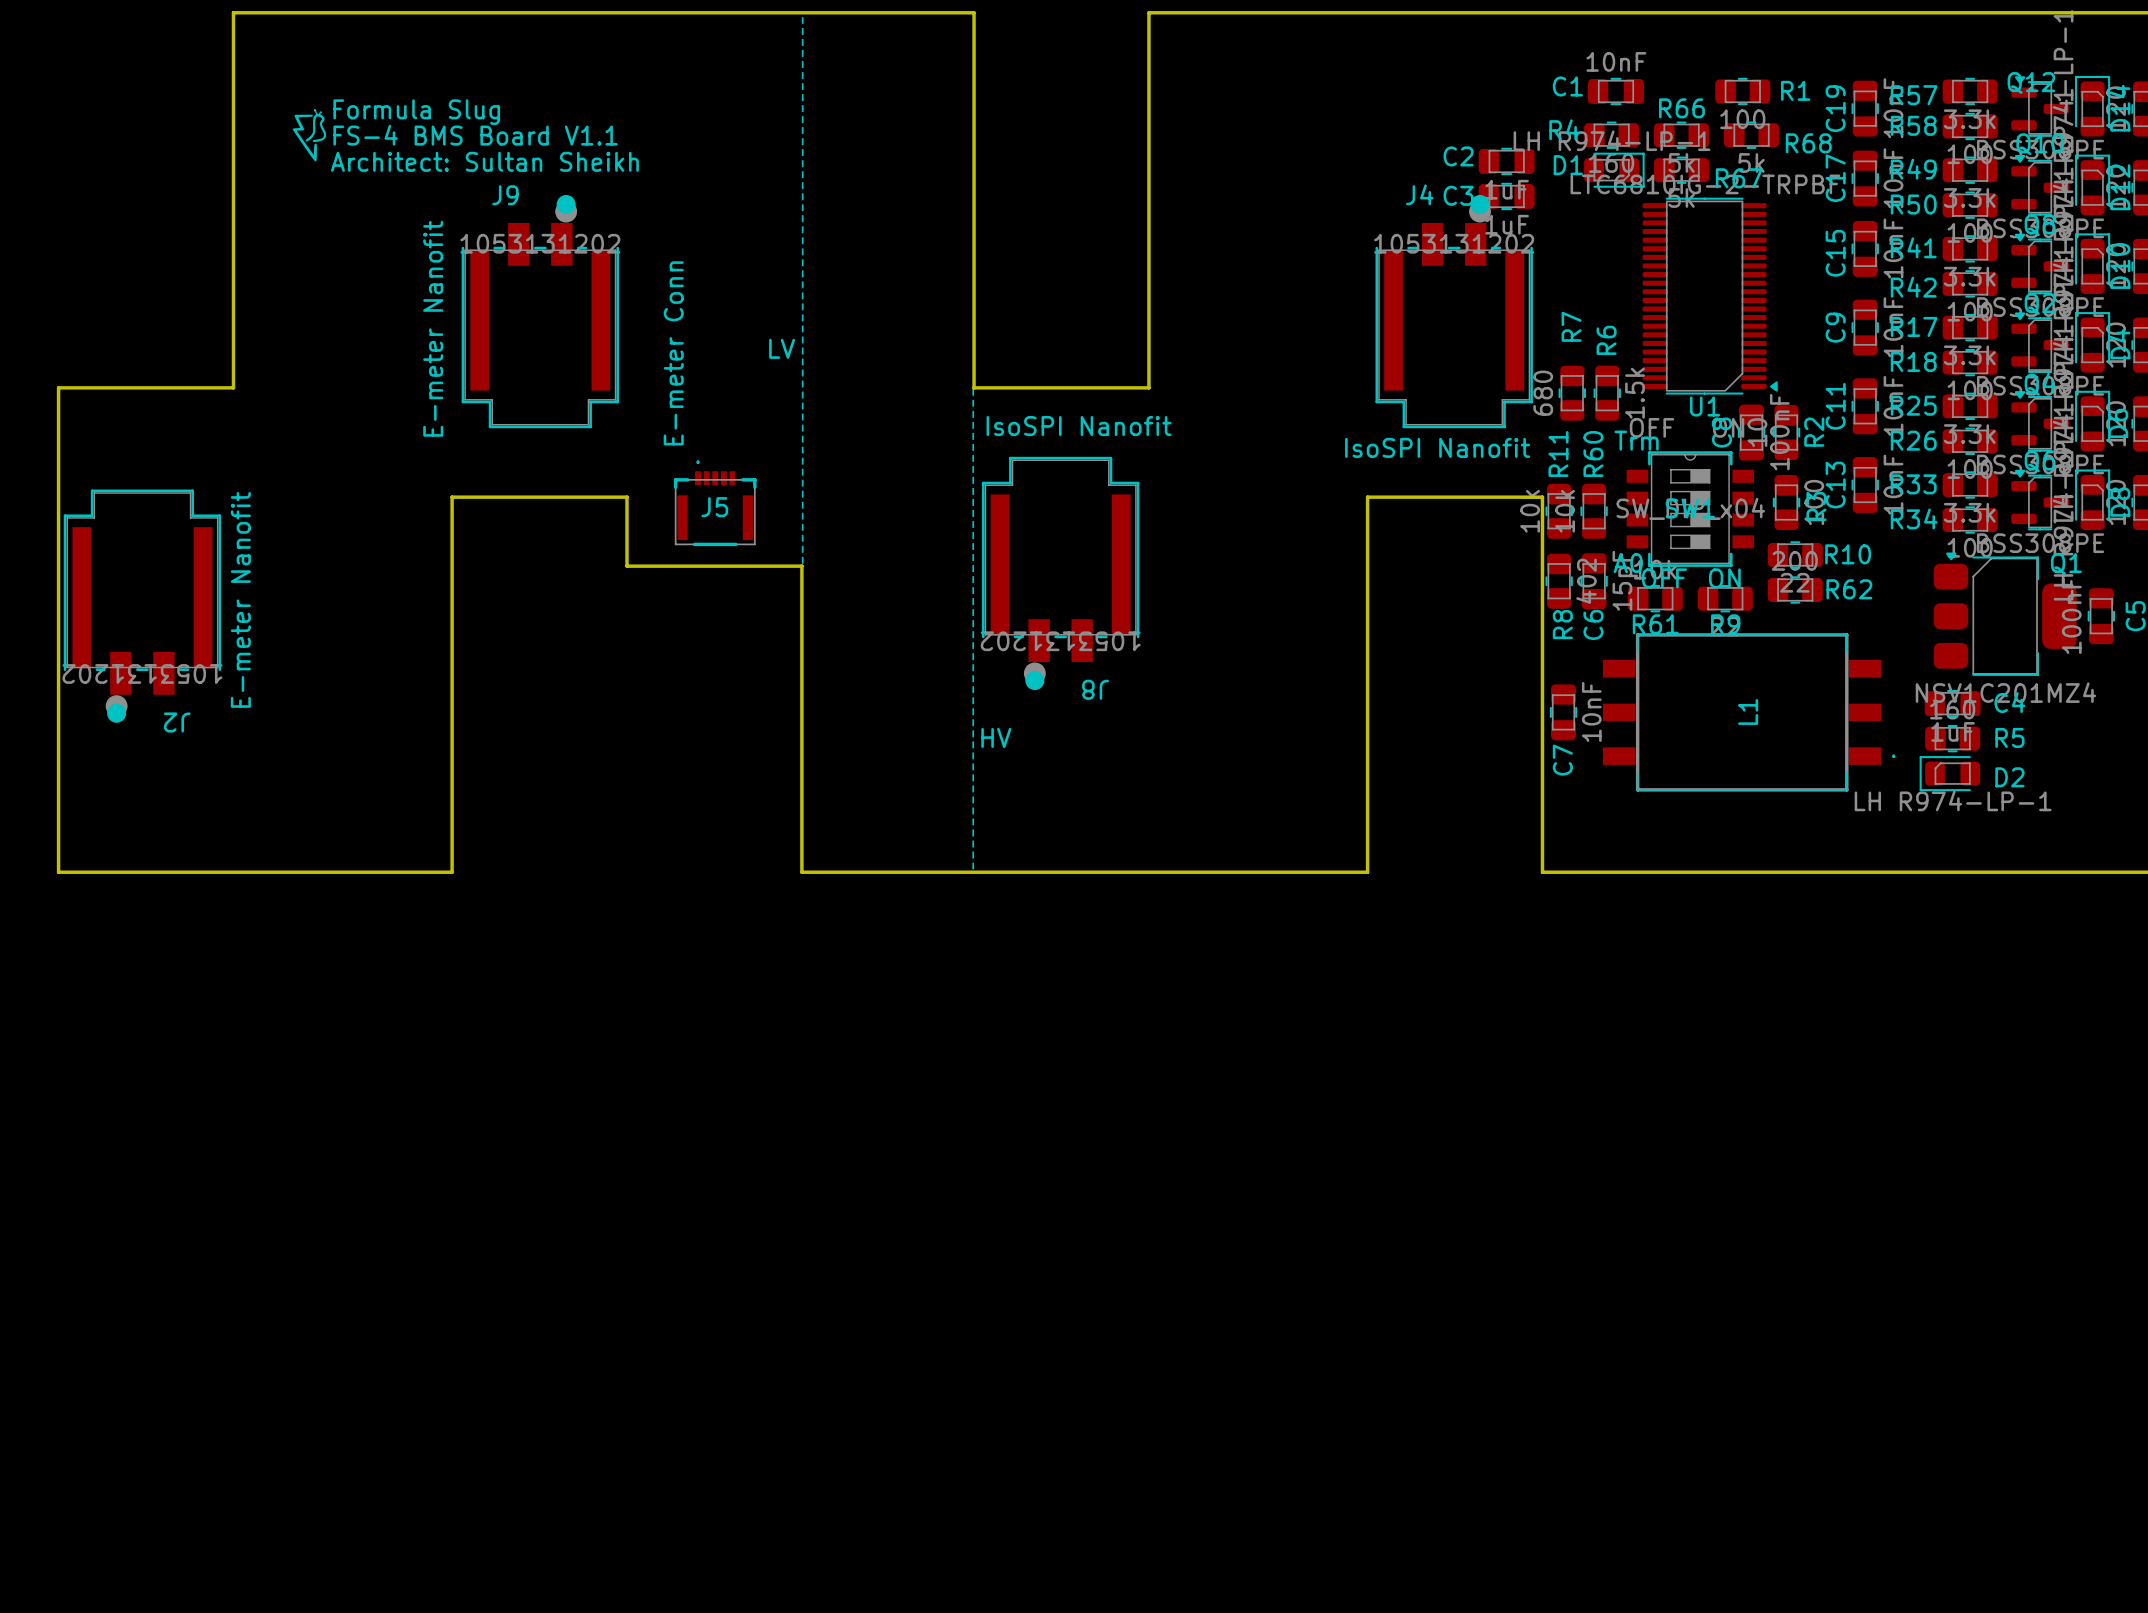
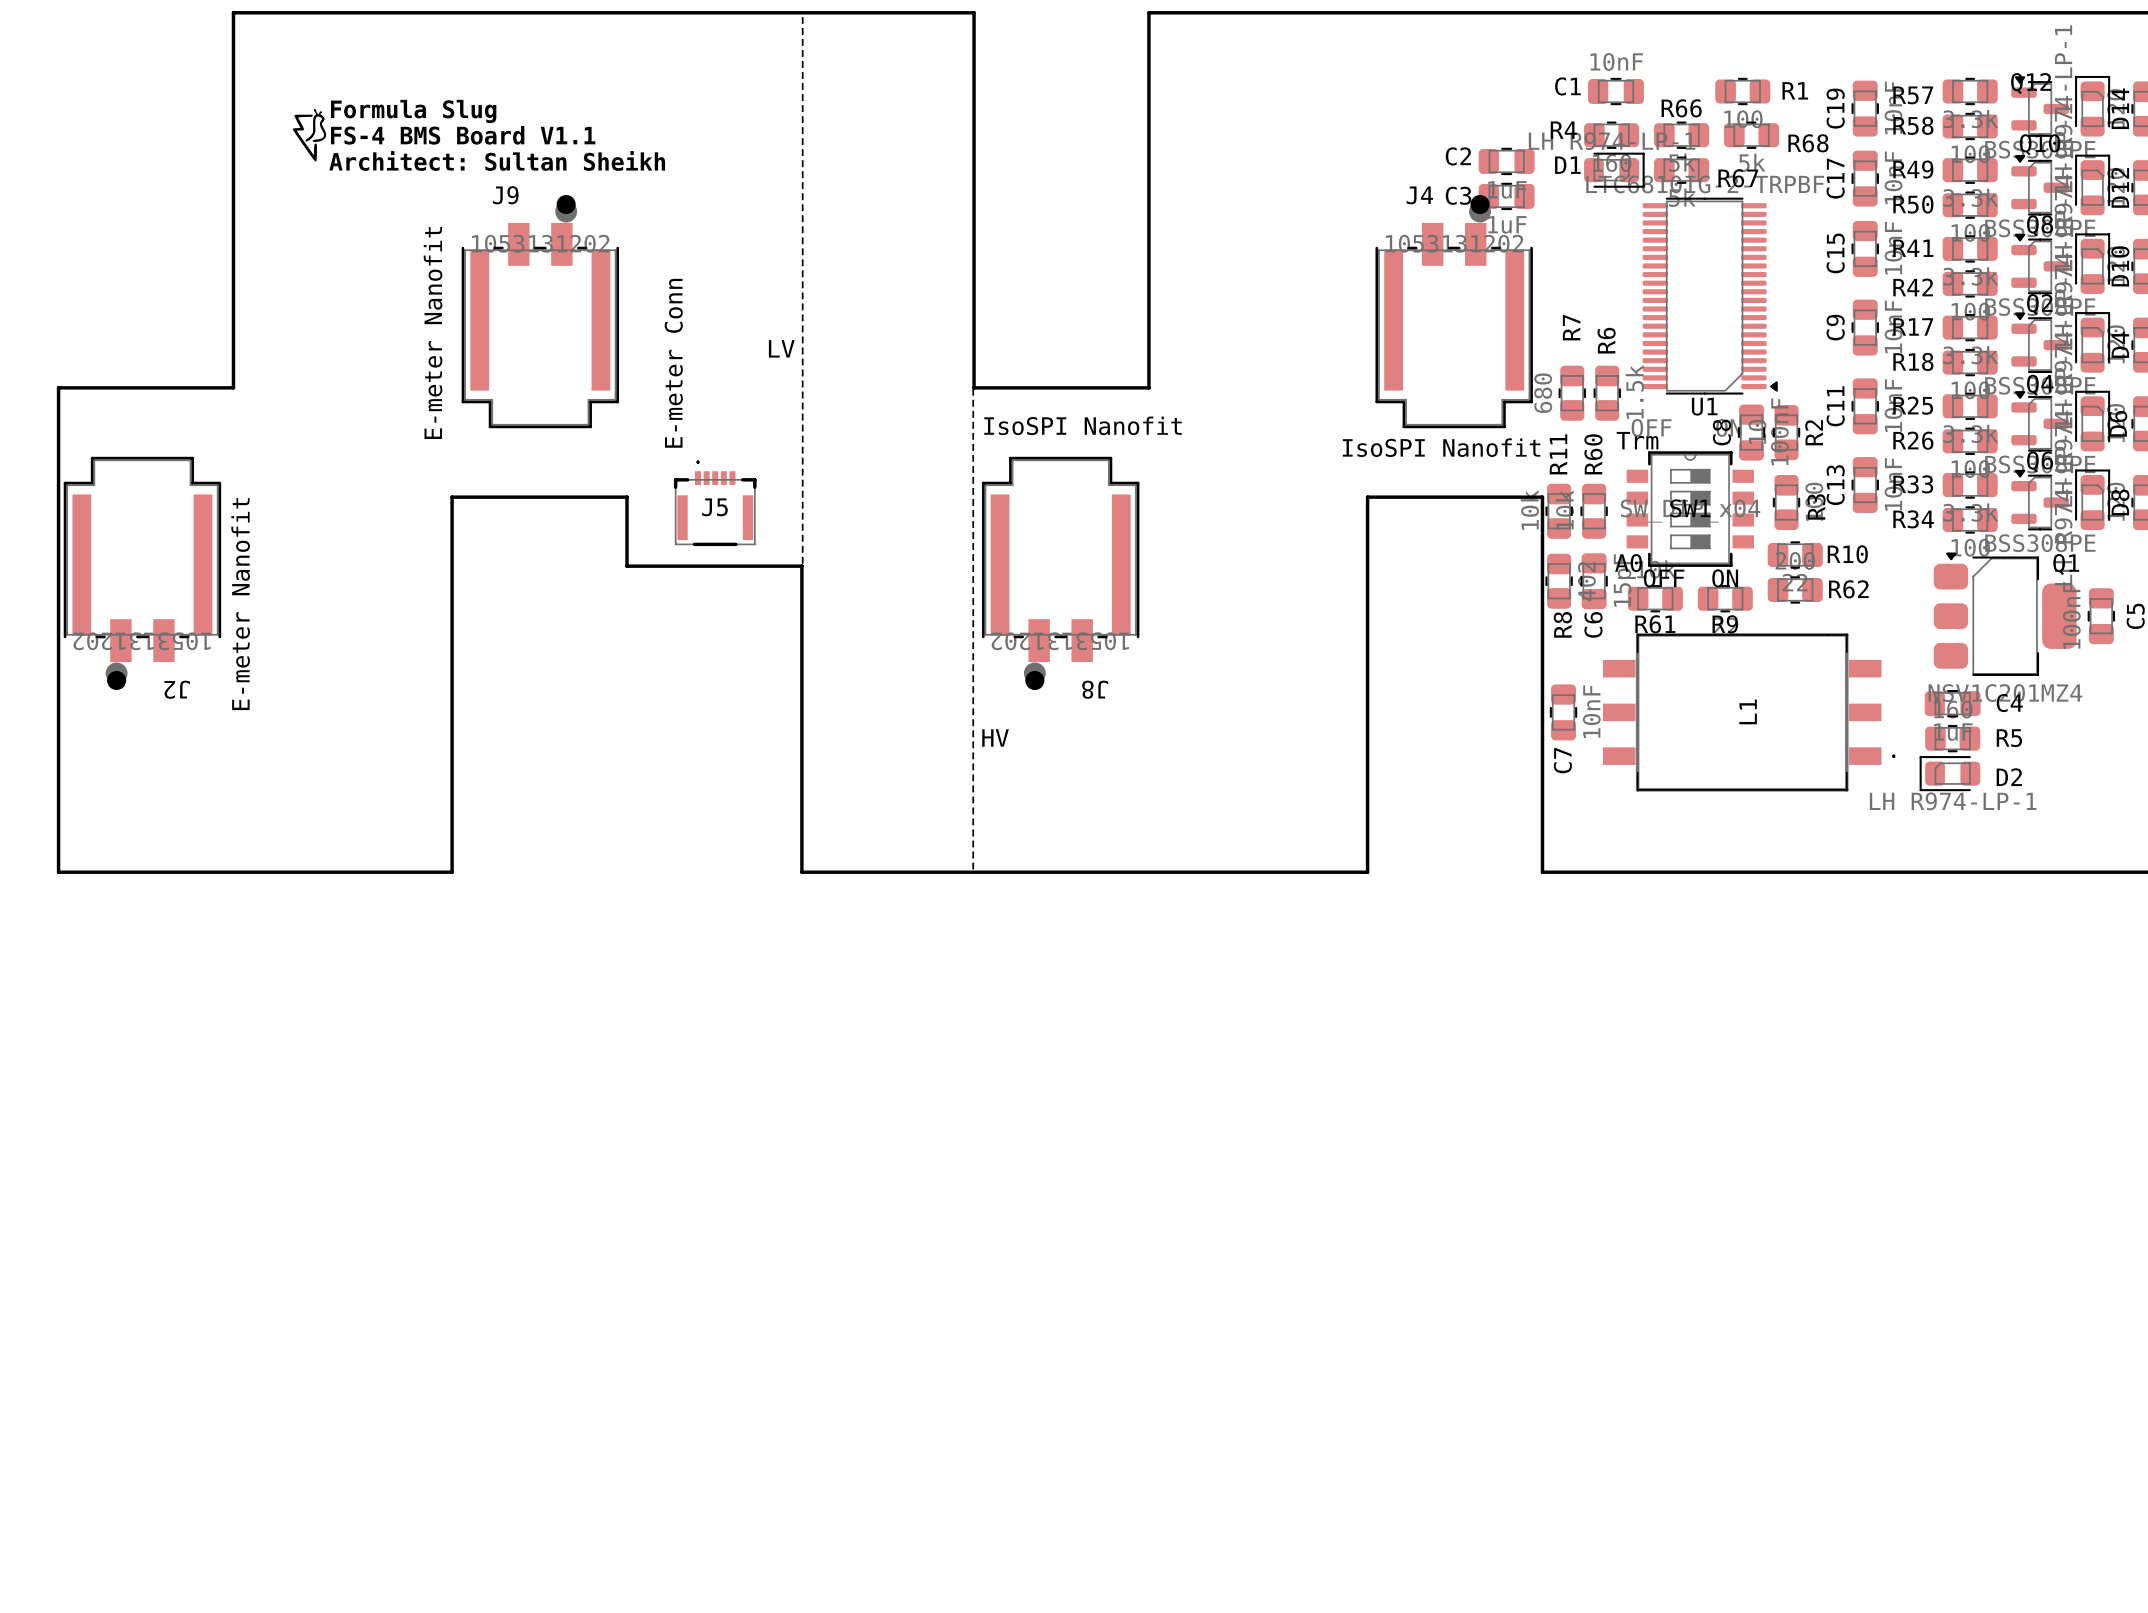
J2 position: (142, 606) -> (142, 573)

